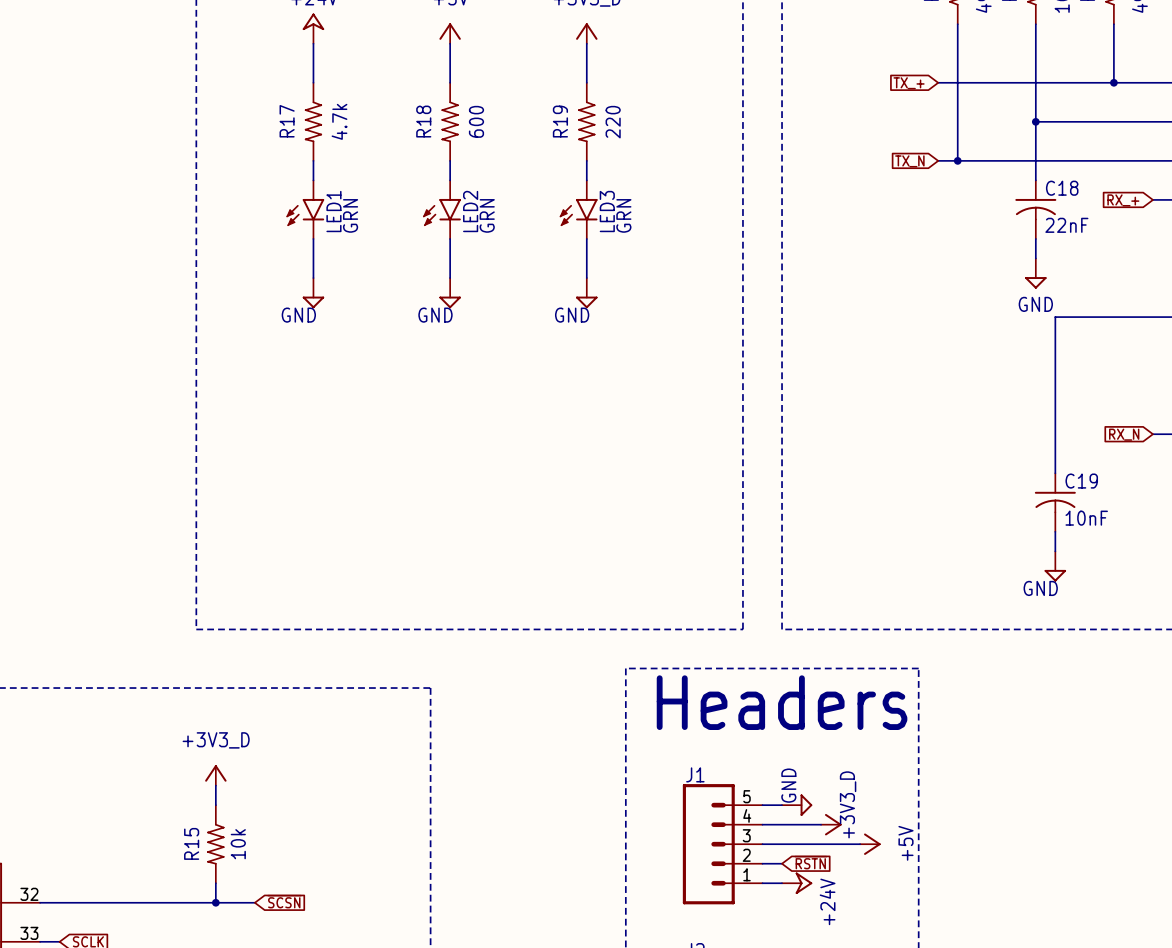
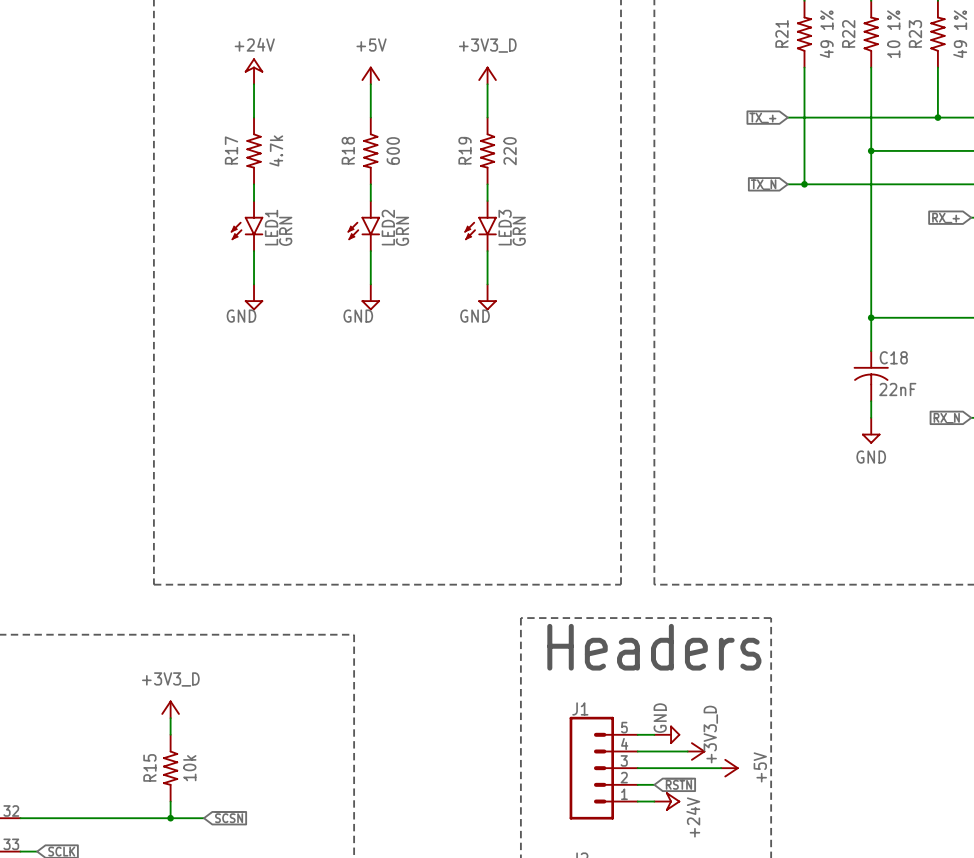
C18 position: (1035, 209) -> (871, 376)
wire: none -> (871, 267) (871, 351)
power symbol: GND (1035, 273) -> none
junction: none -> (871, 317)
wire: (1055, 317) (1055, 473) -> (887, 317) (871, 317)
power symbol: none -> GND (871, 430)
C19: 10nF (1055, 502) -> none
wire: (1055, 531) (1055, 551) -> (871, 401) (871, 417)
power symbol: GND (1055, 566) -> none

